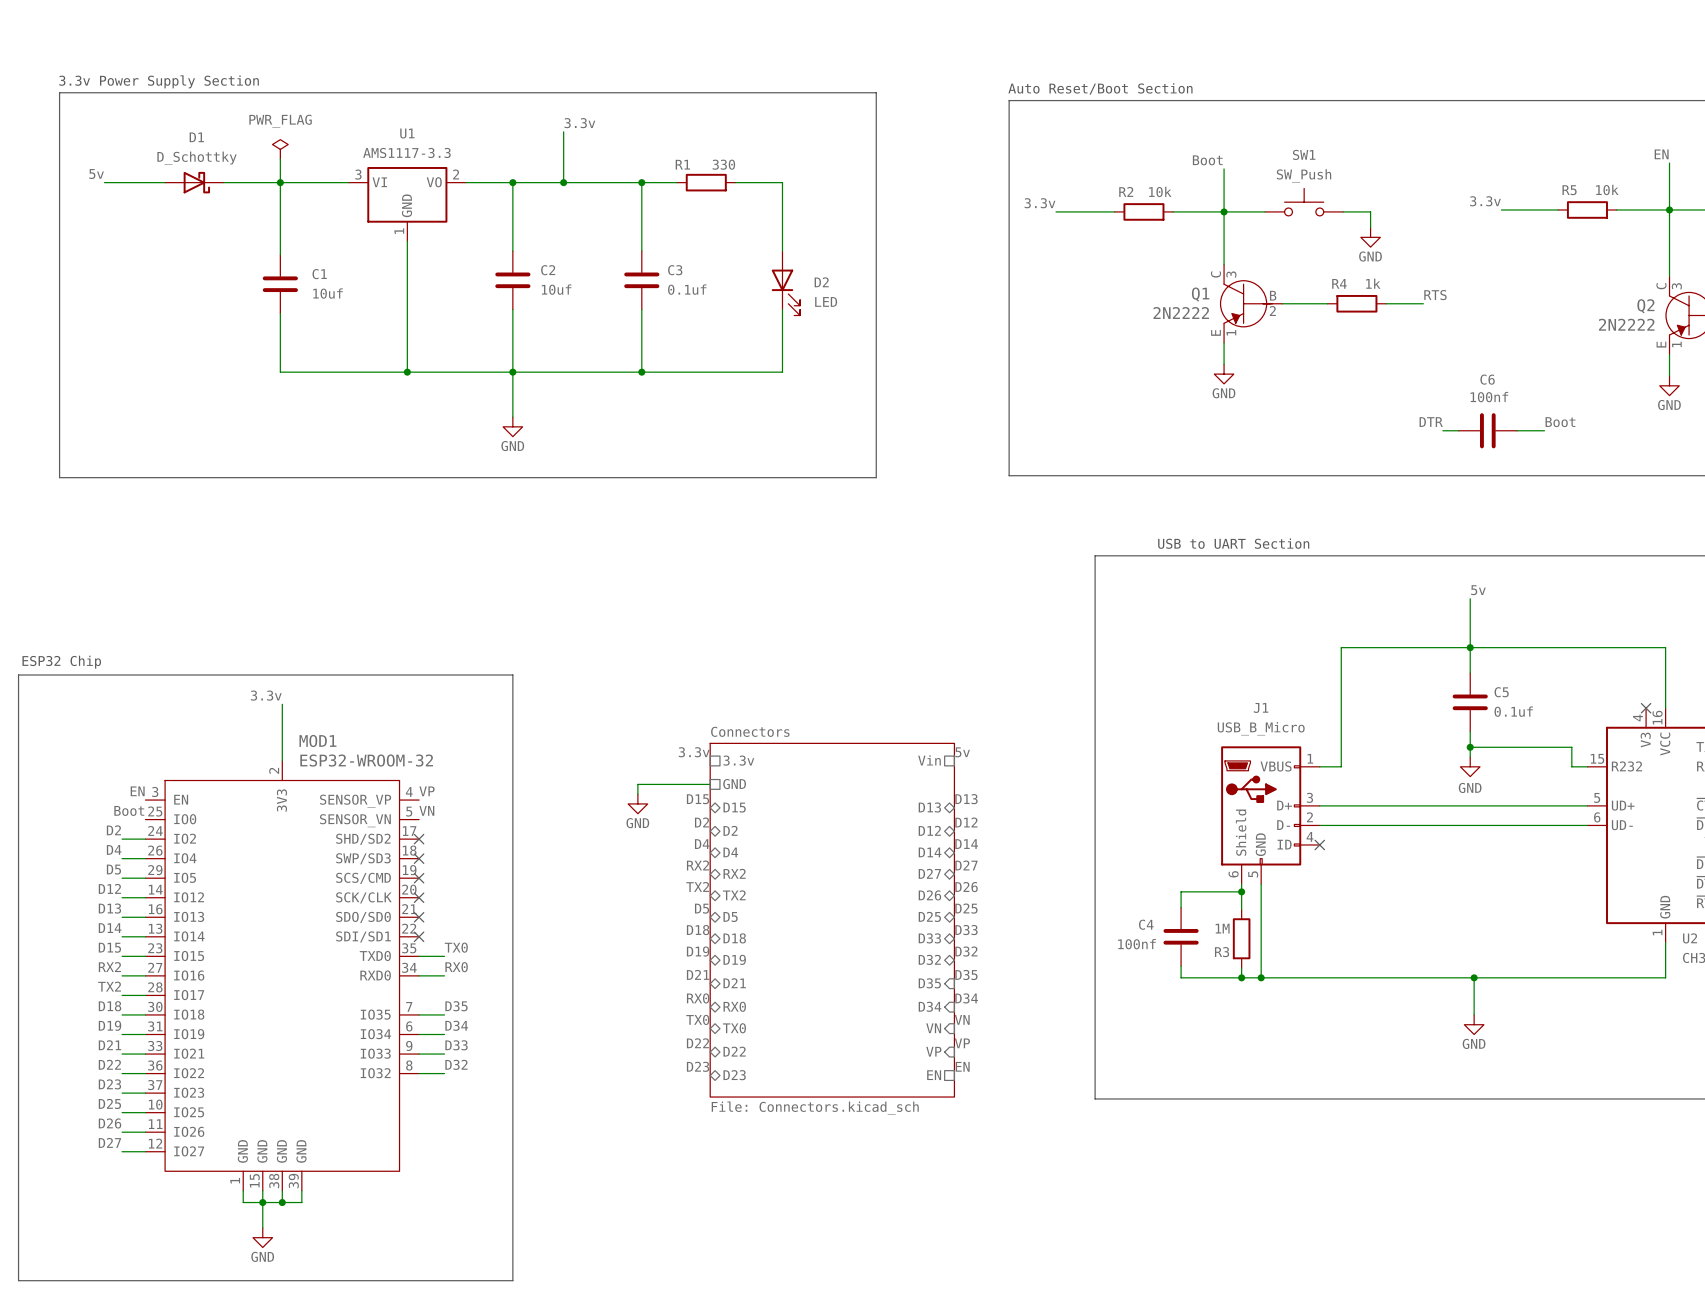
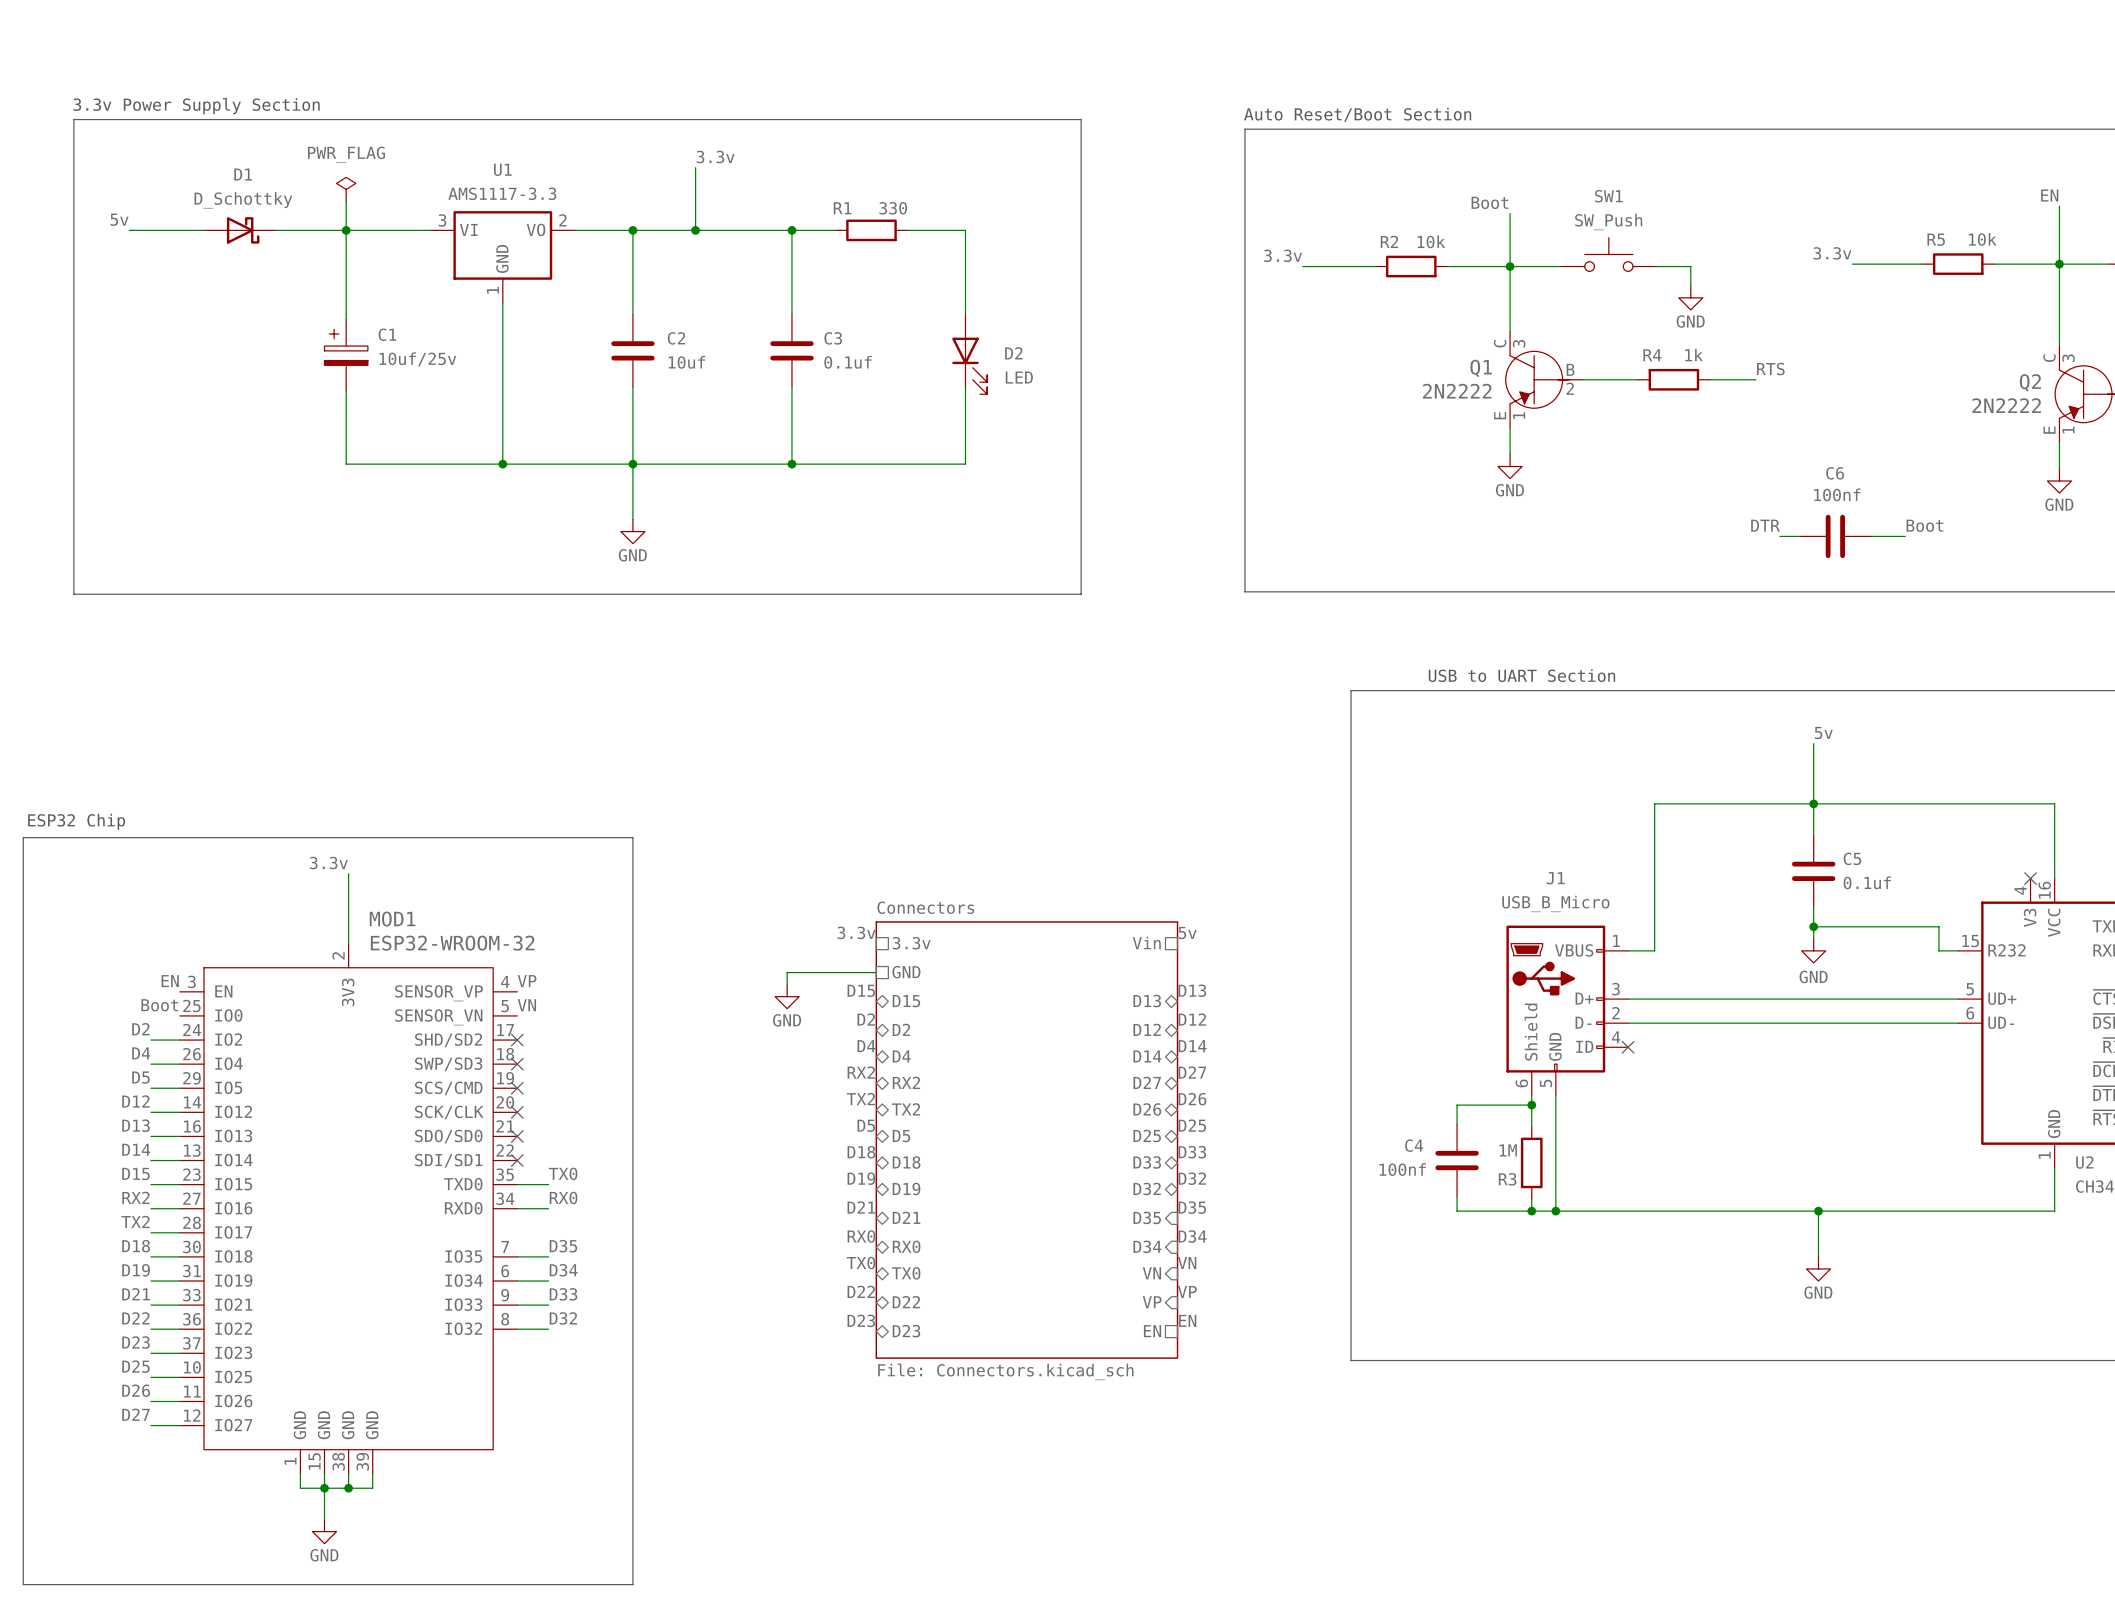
C1 symbol: [262, 254, 298, 314] -> [324, 319, 368, 392]
C1 value: 10uf (328, 293) -> 10uf/25v (417, 359)

